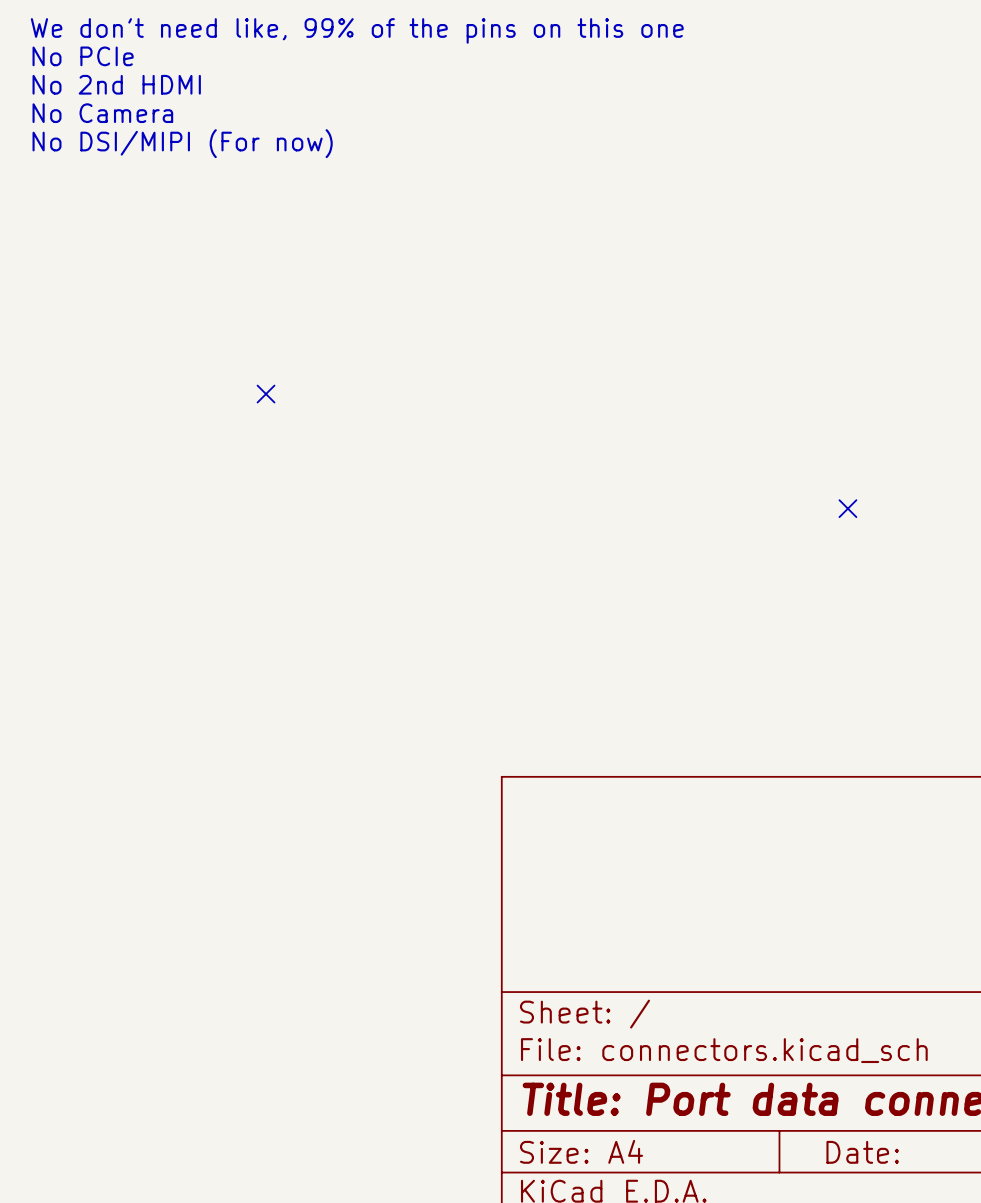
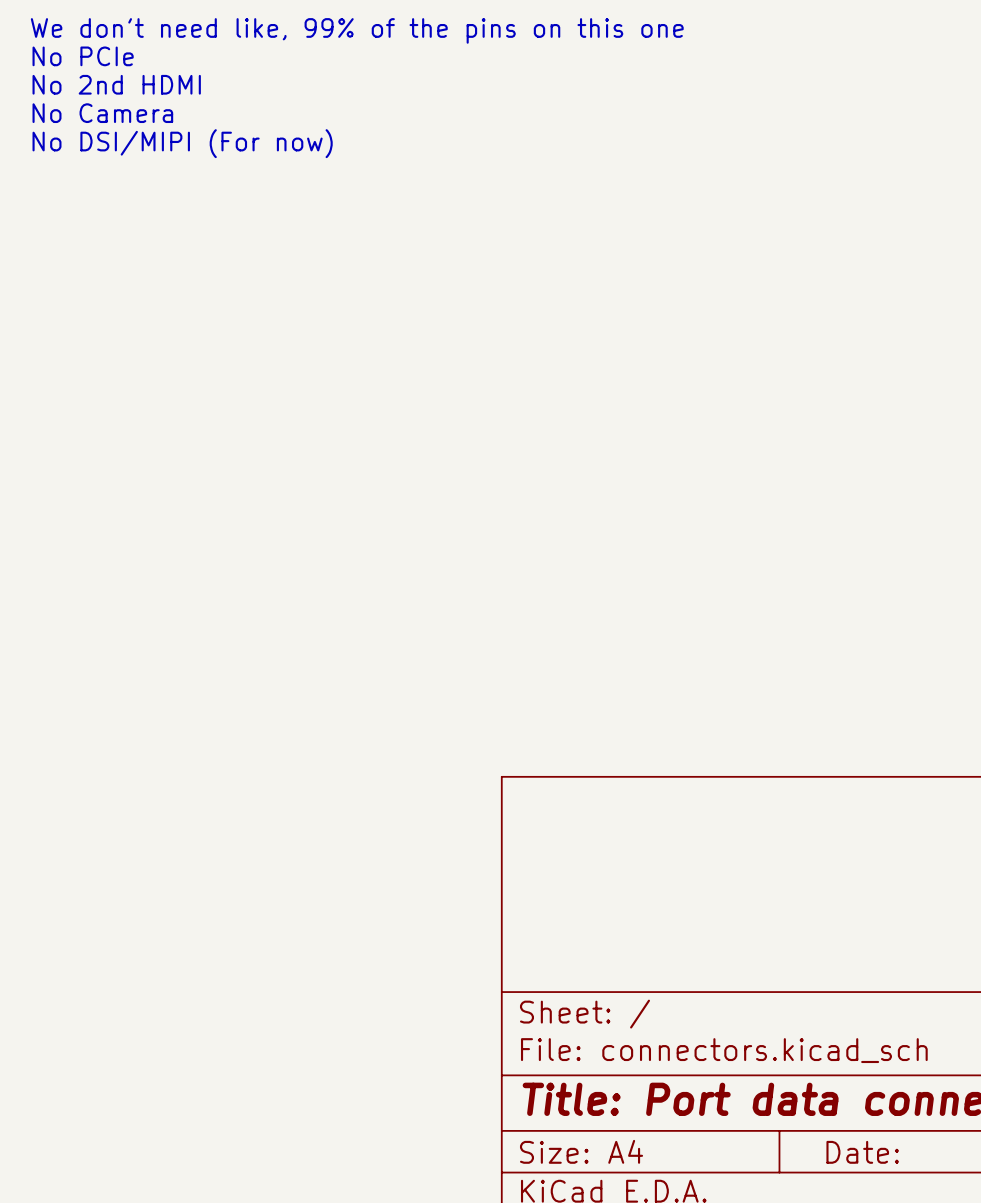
no-connect mark: (266, 394) -> none
no-connect mark: (847, 508) -> none

